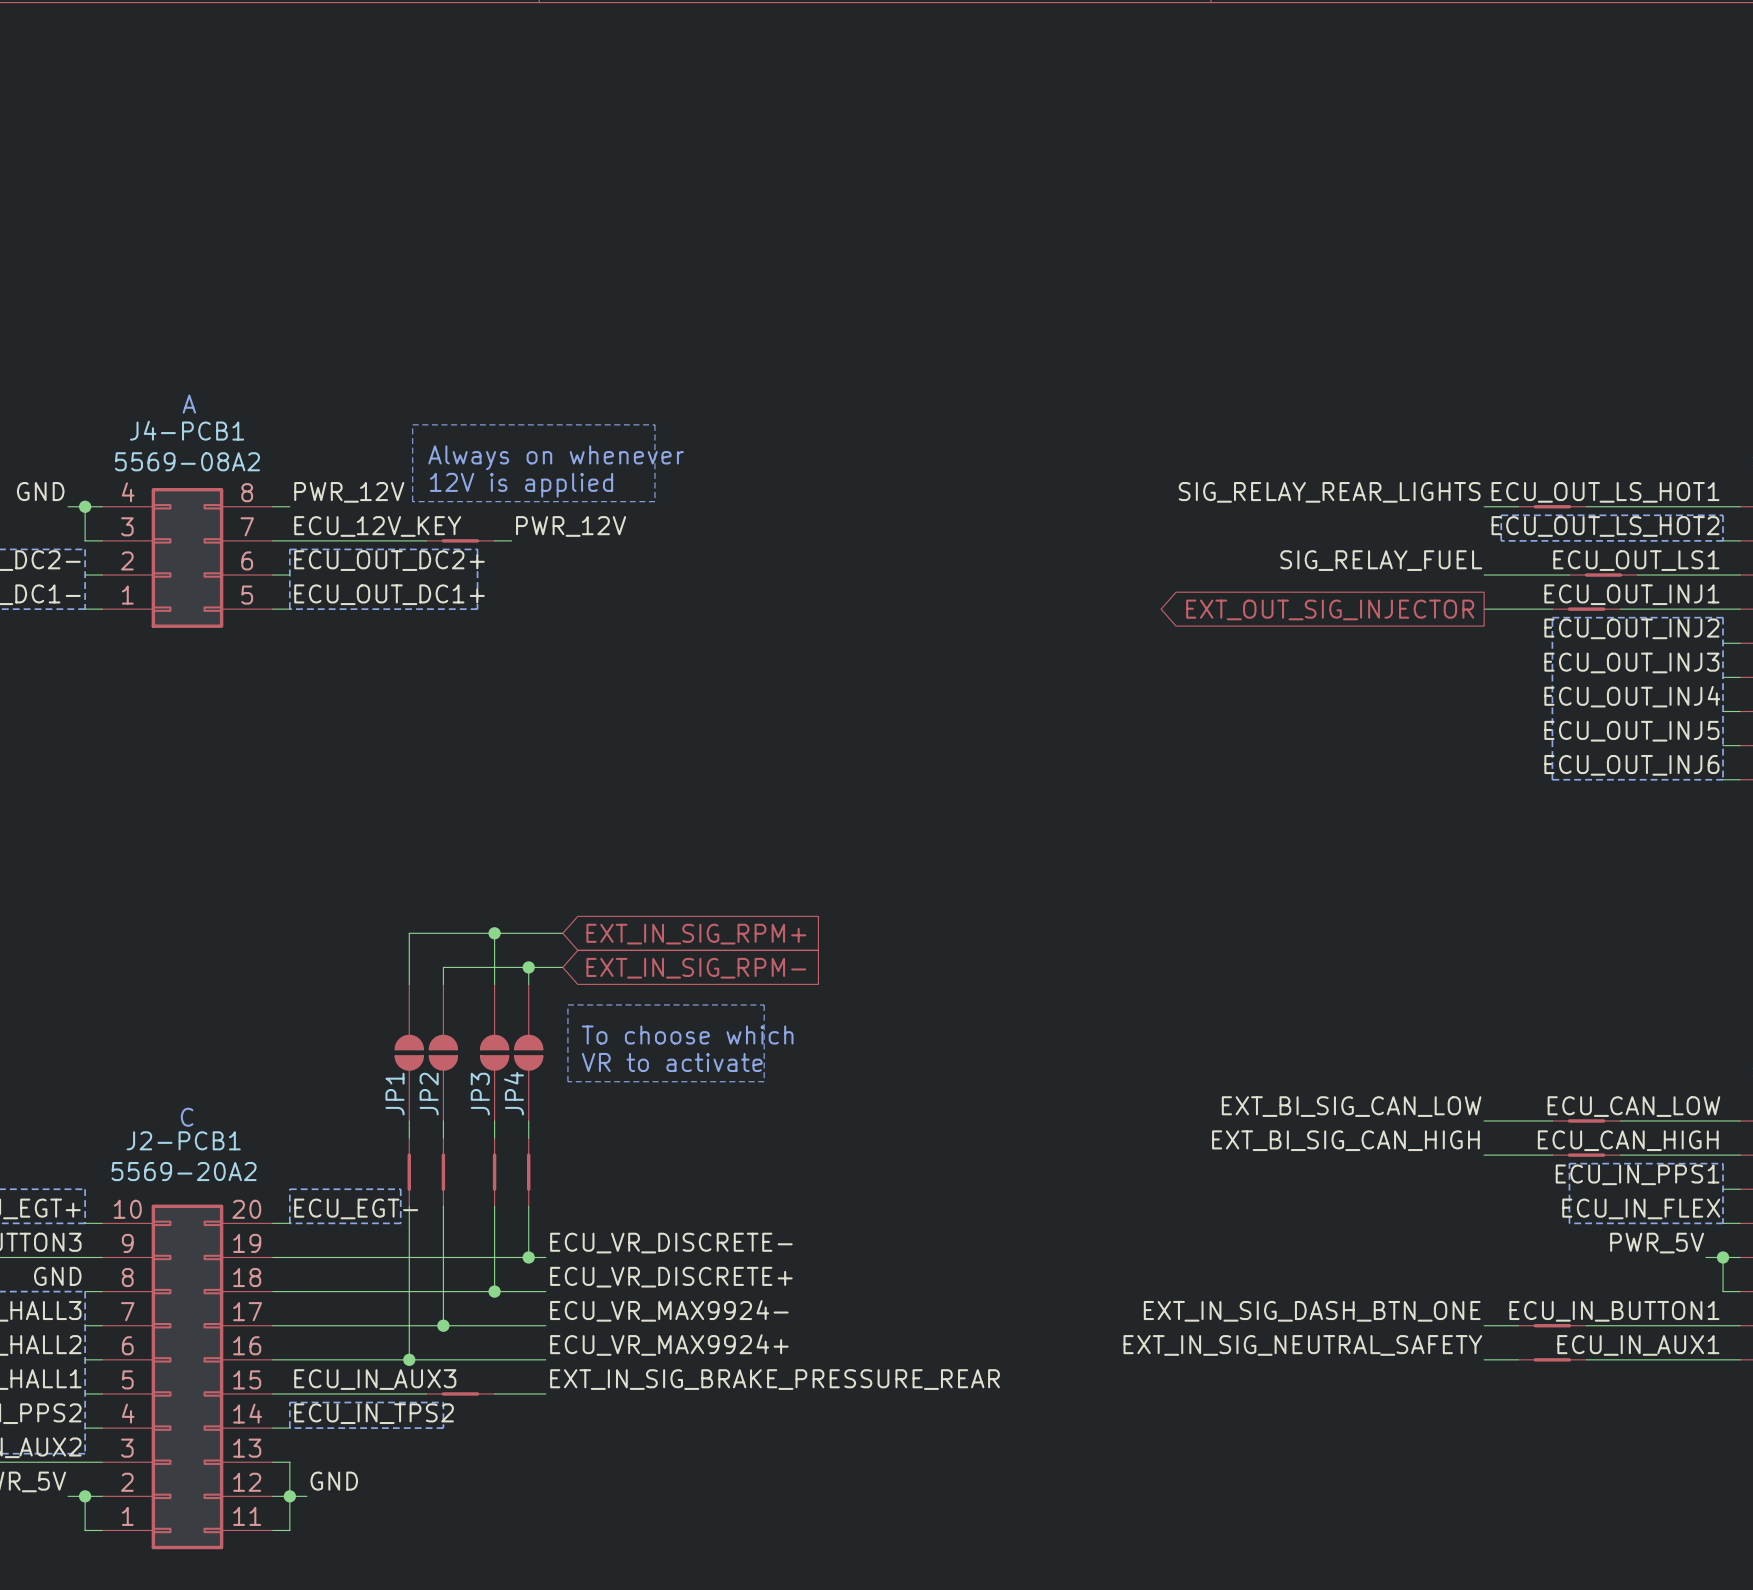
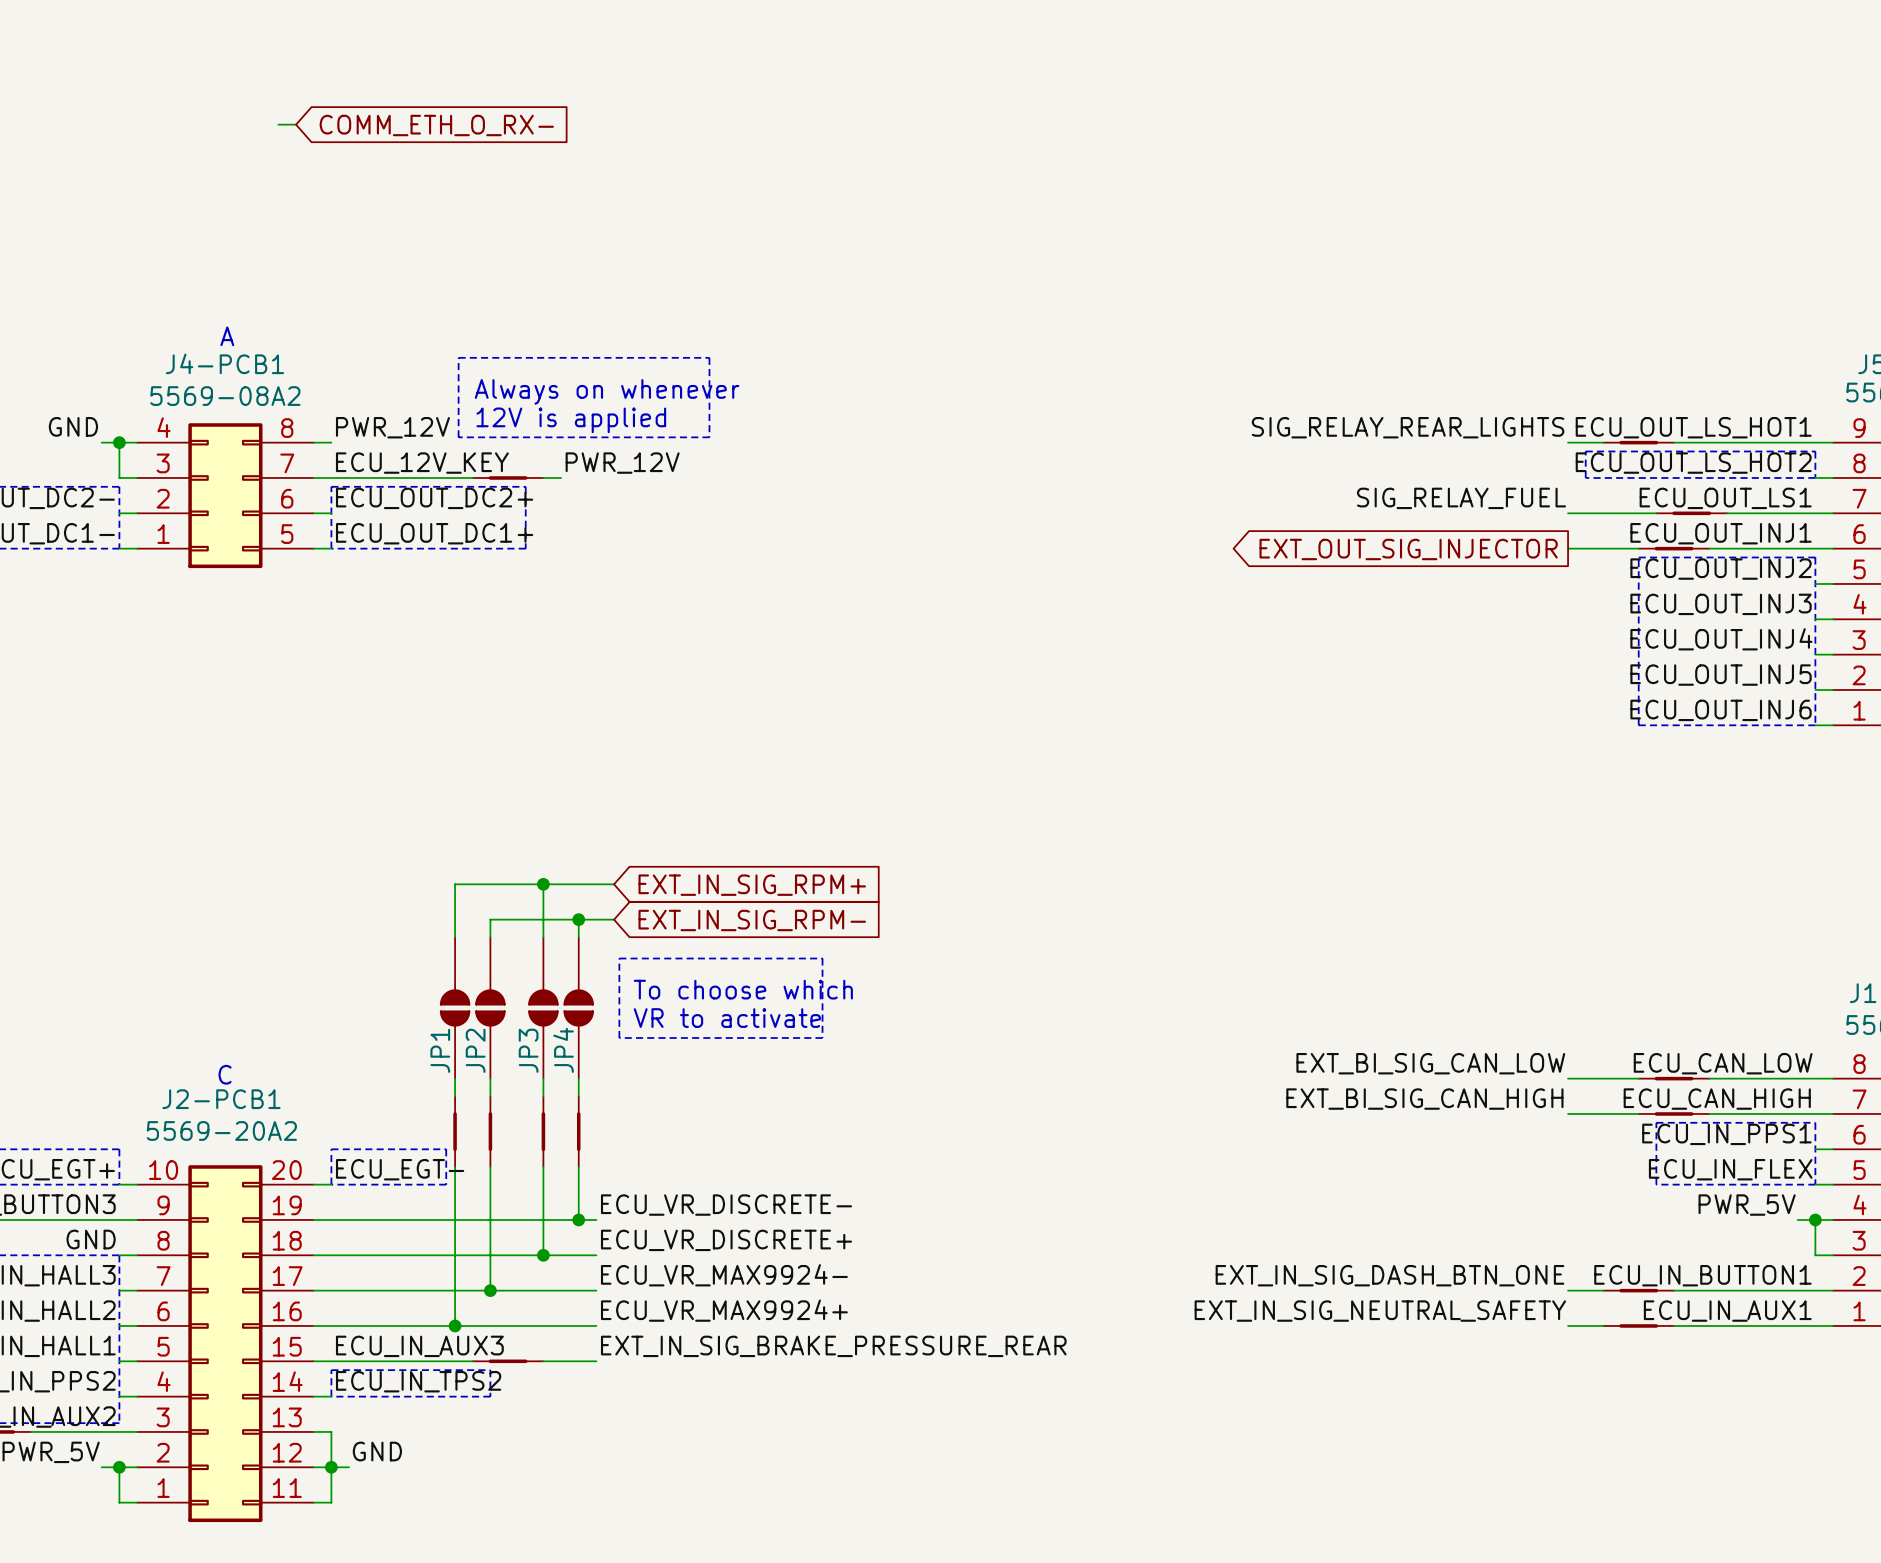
wire: none -> (278, 124) (296, 124)
global label: none -> COMM_ETH_O_RX- (436, 125)

